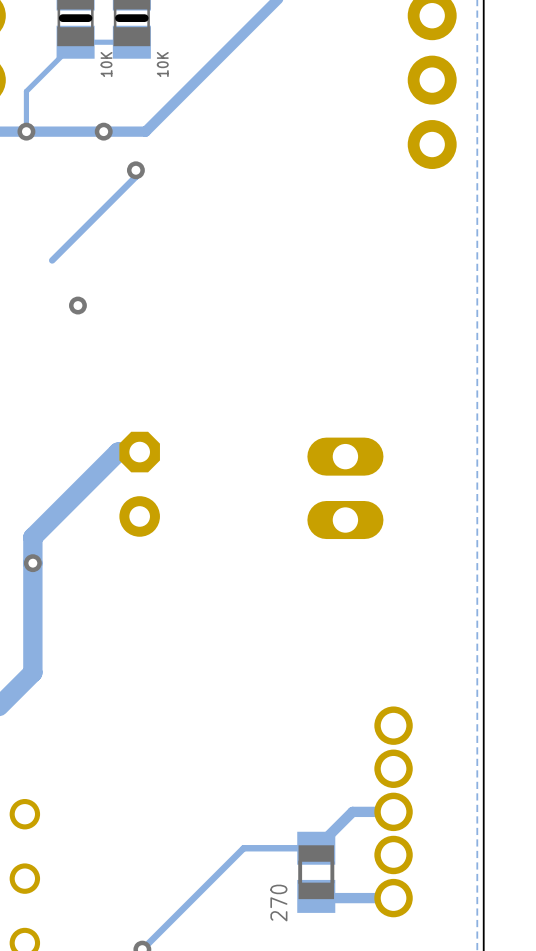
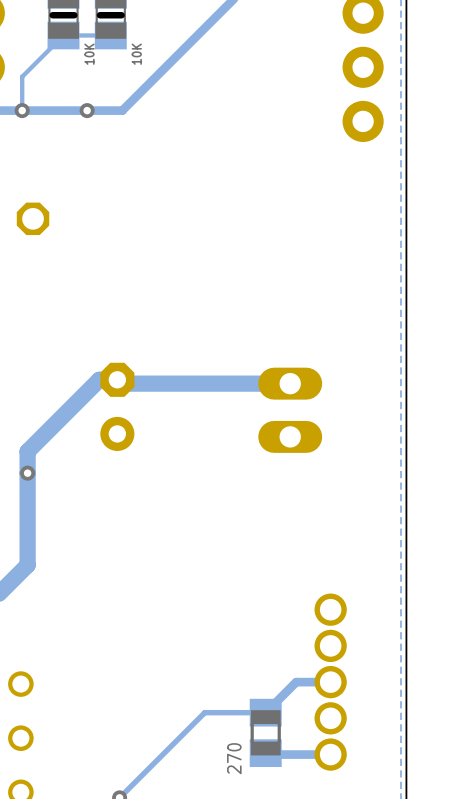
track: (135, 170) (135, 176) (52, 260) -> none
via: (135, 170) -> none
part: none -> (33, 218)
via: (77, 305) -> none
track: none -> (117, 379) (121, 383) (290, 383)

